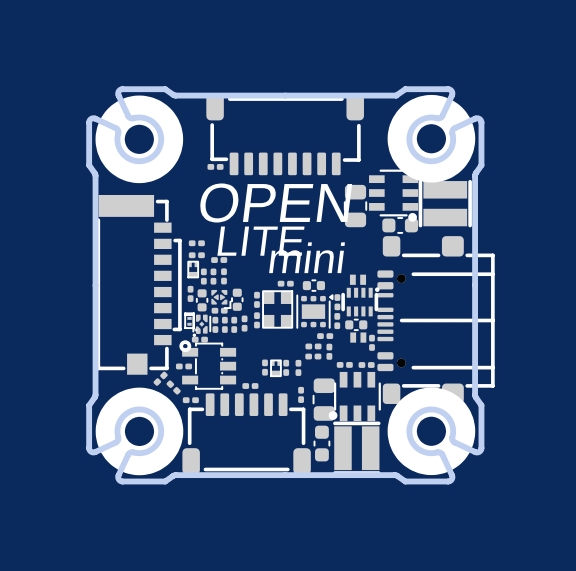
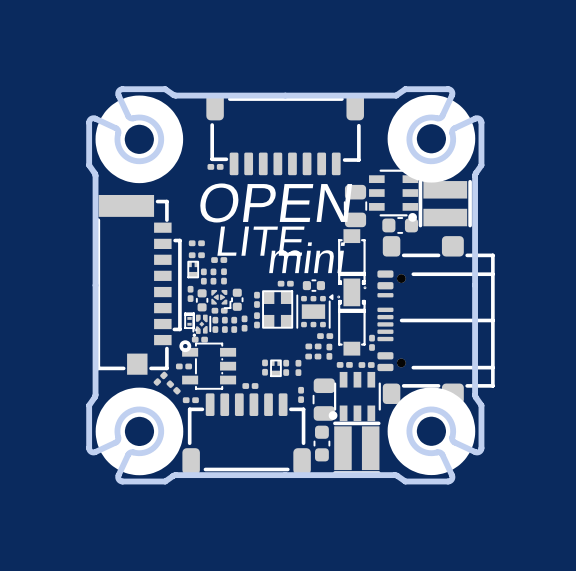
part: none -> (351, 260)
part: (357, 279) -> none
part: (360, 301) -> none
part: (337, 302) -> none
part footprint: [345, 318, 368, 331] -> [337, 292, 366, 356]
part: (337, 321) -> none
part: (358, 337) -> none

